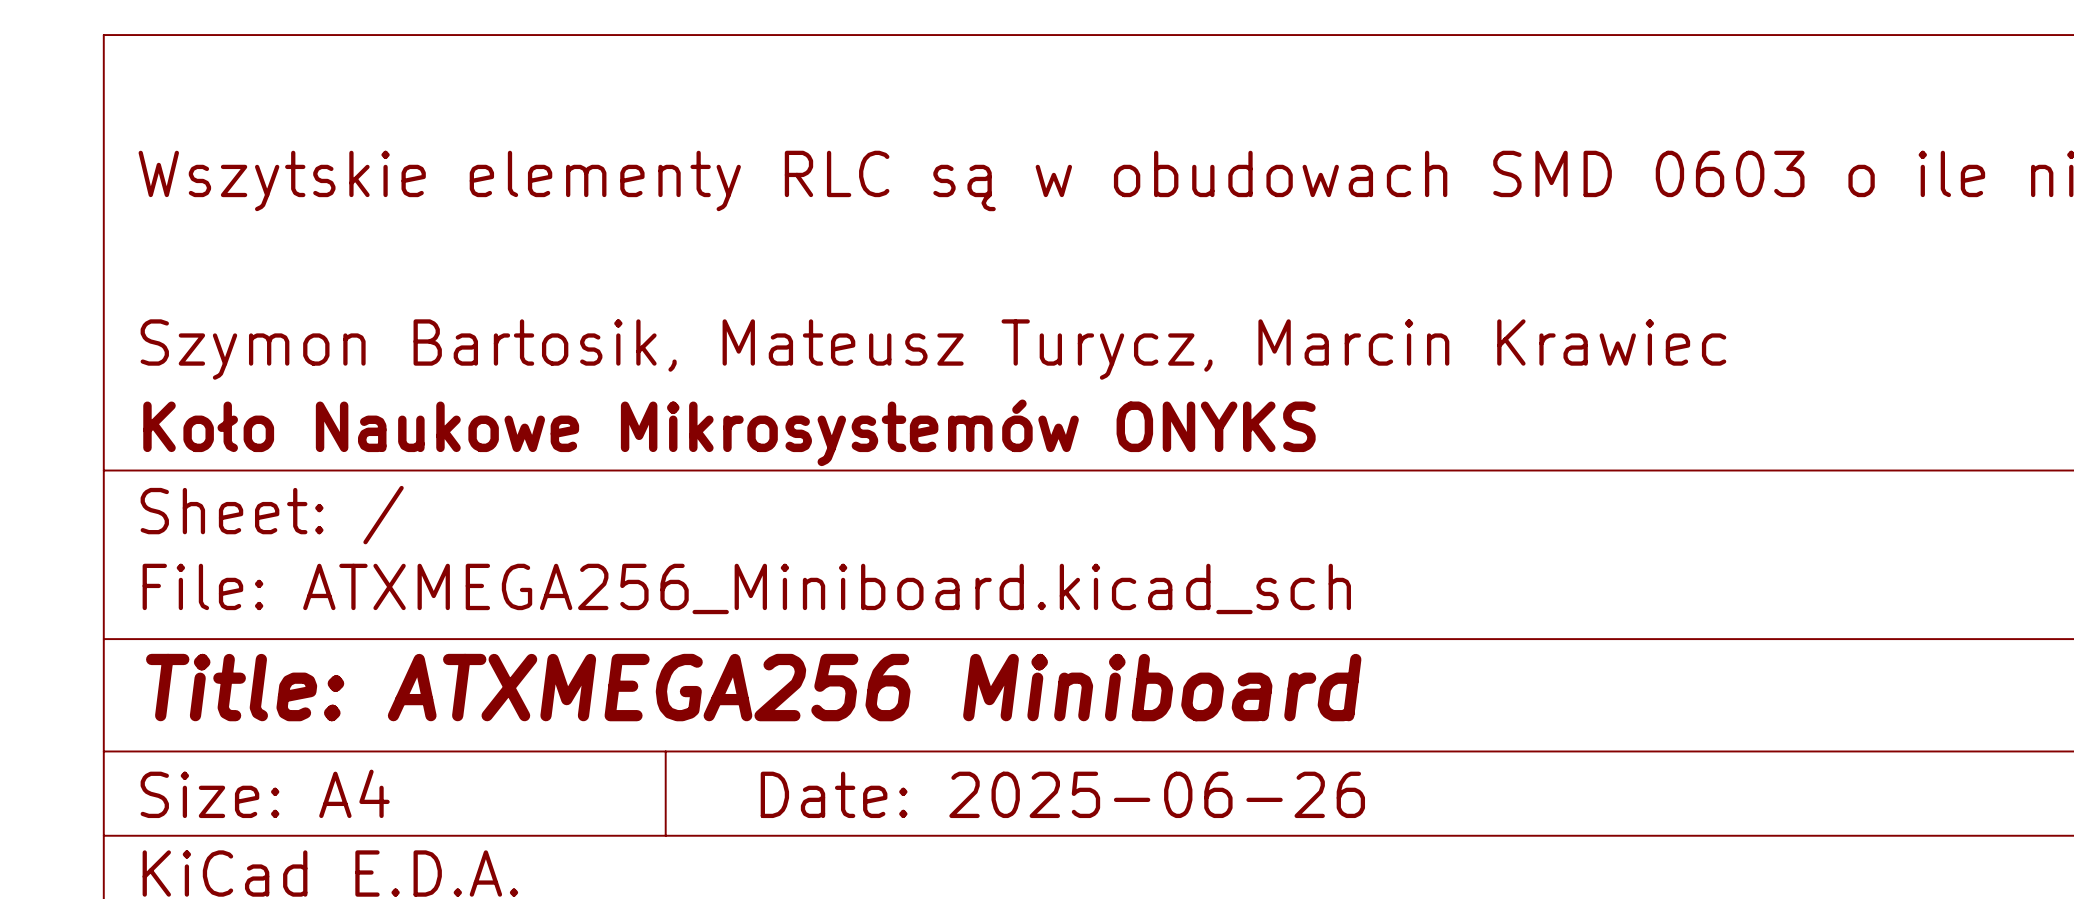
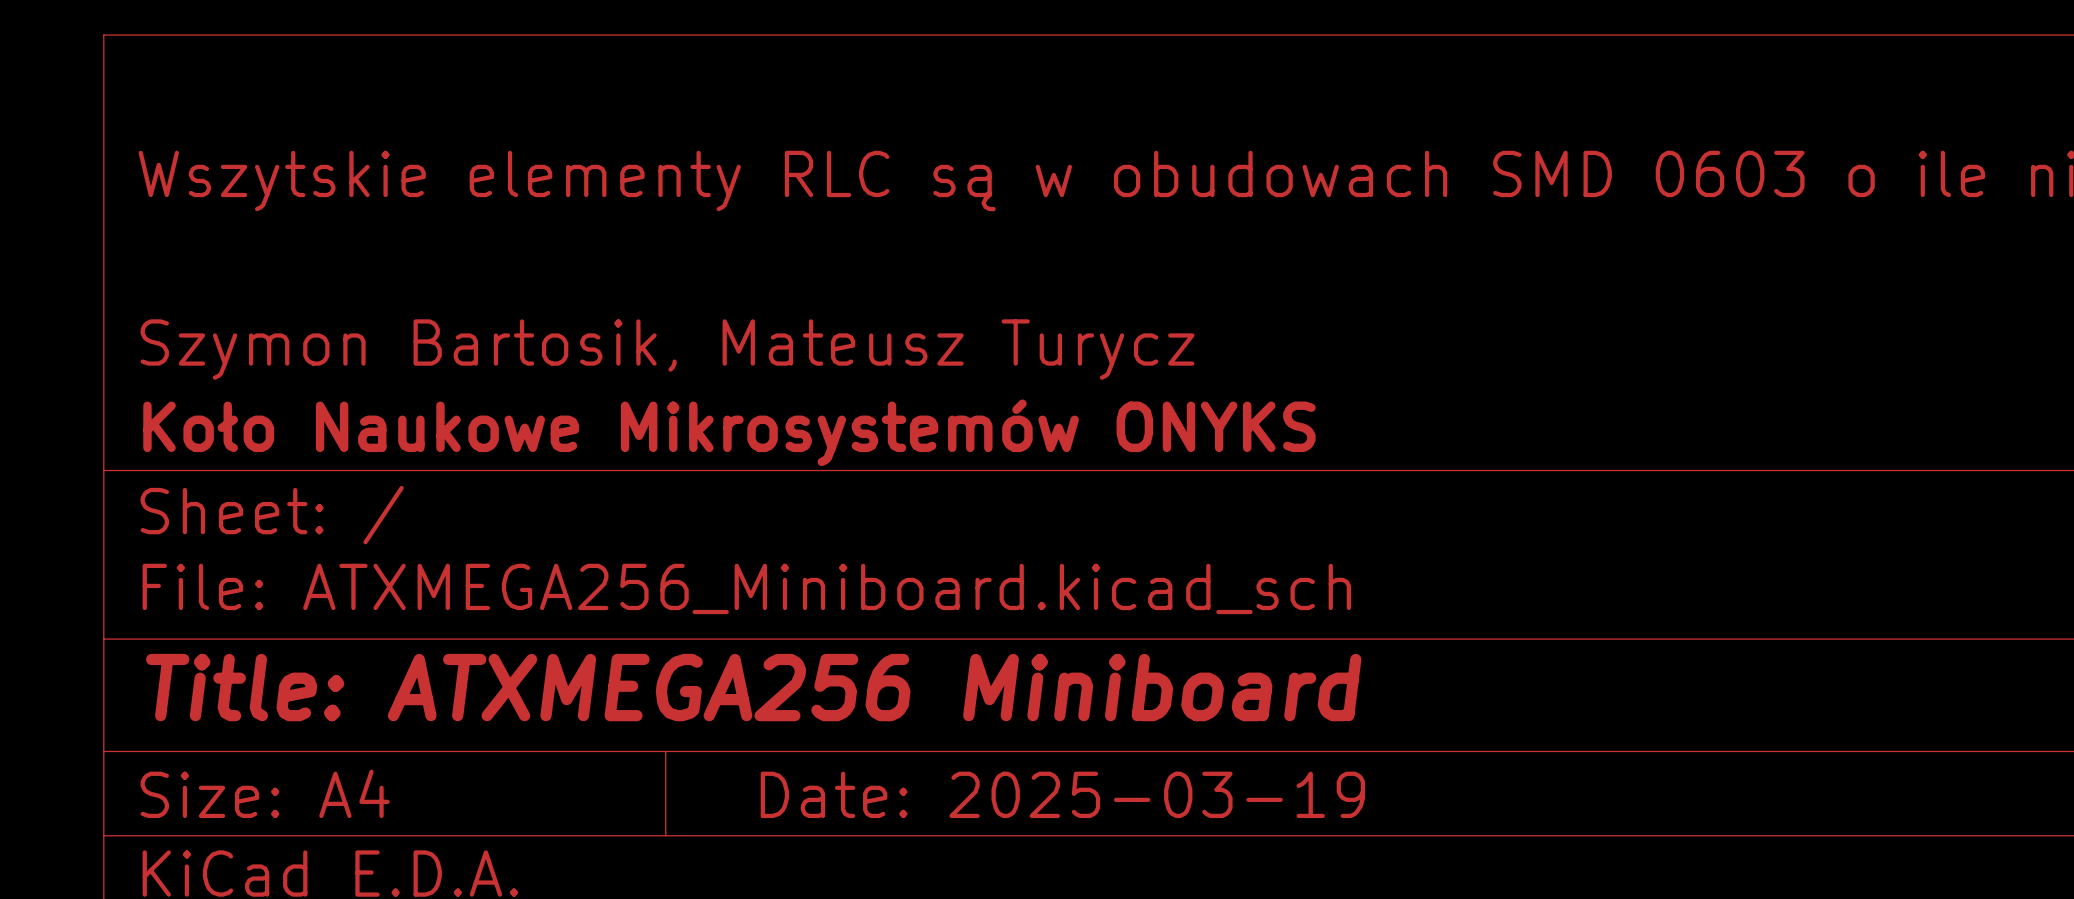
title block: Szymon Bartosik, Mateusz Turycz, Marcin Krawiec (933, 349) -> Szymon Bartosik, Mateusz Turycz (667, 349)
title block: Date: 2025-06-26 (1062, 794) -> Date: 2025-03-19 (1062, 794)

